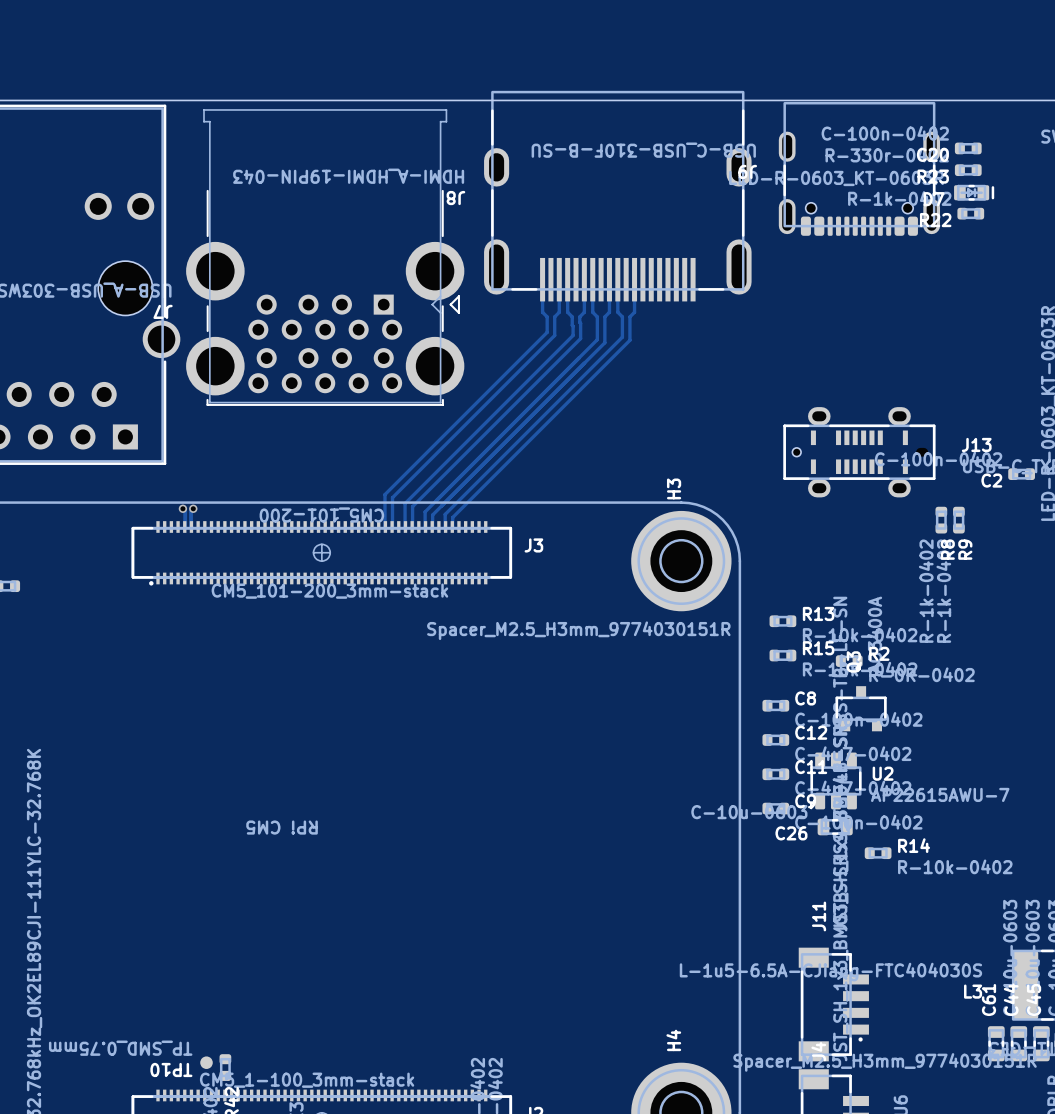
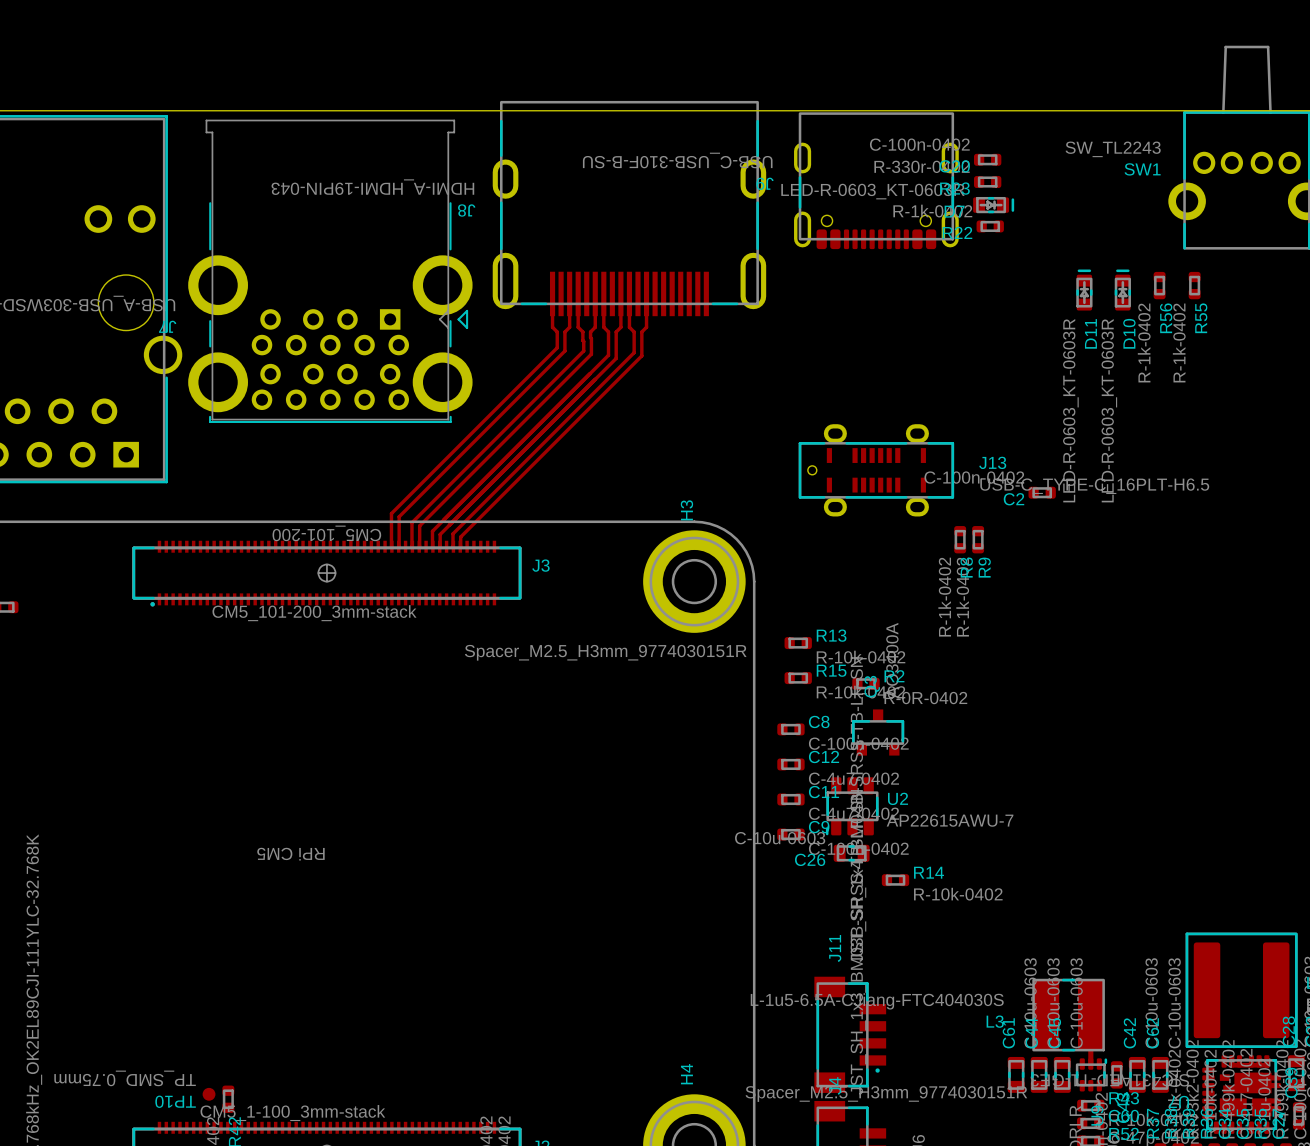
track: (182, 508) (185, 511) (184, 526) -> none
via: (182, 508) -> none
track: (193, 508) (191, 511) (191, 526) -> none
via: (193, 508) -> none

